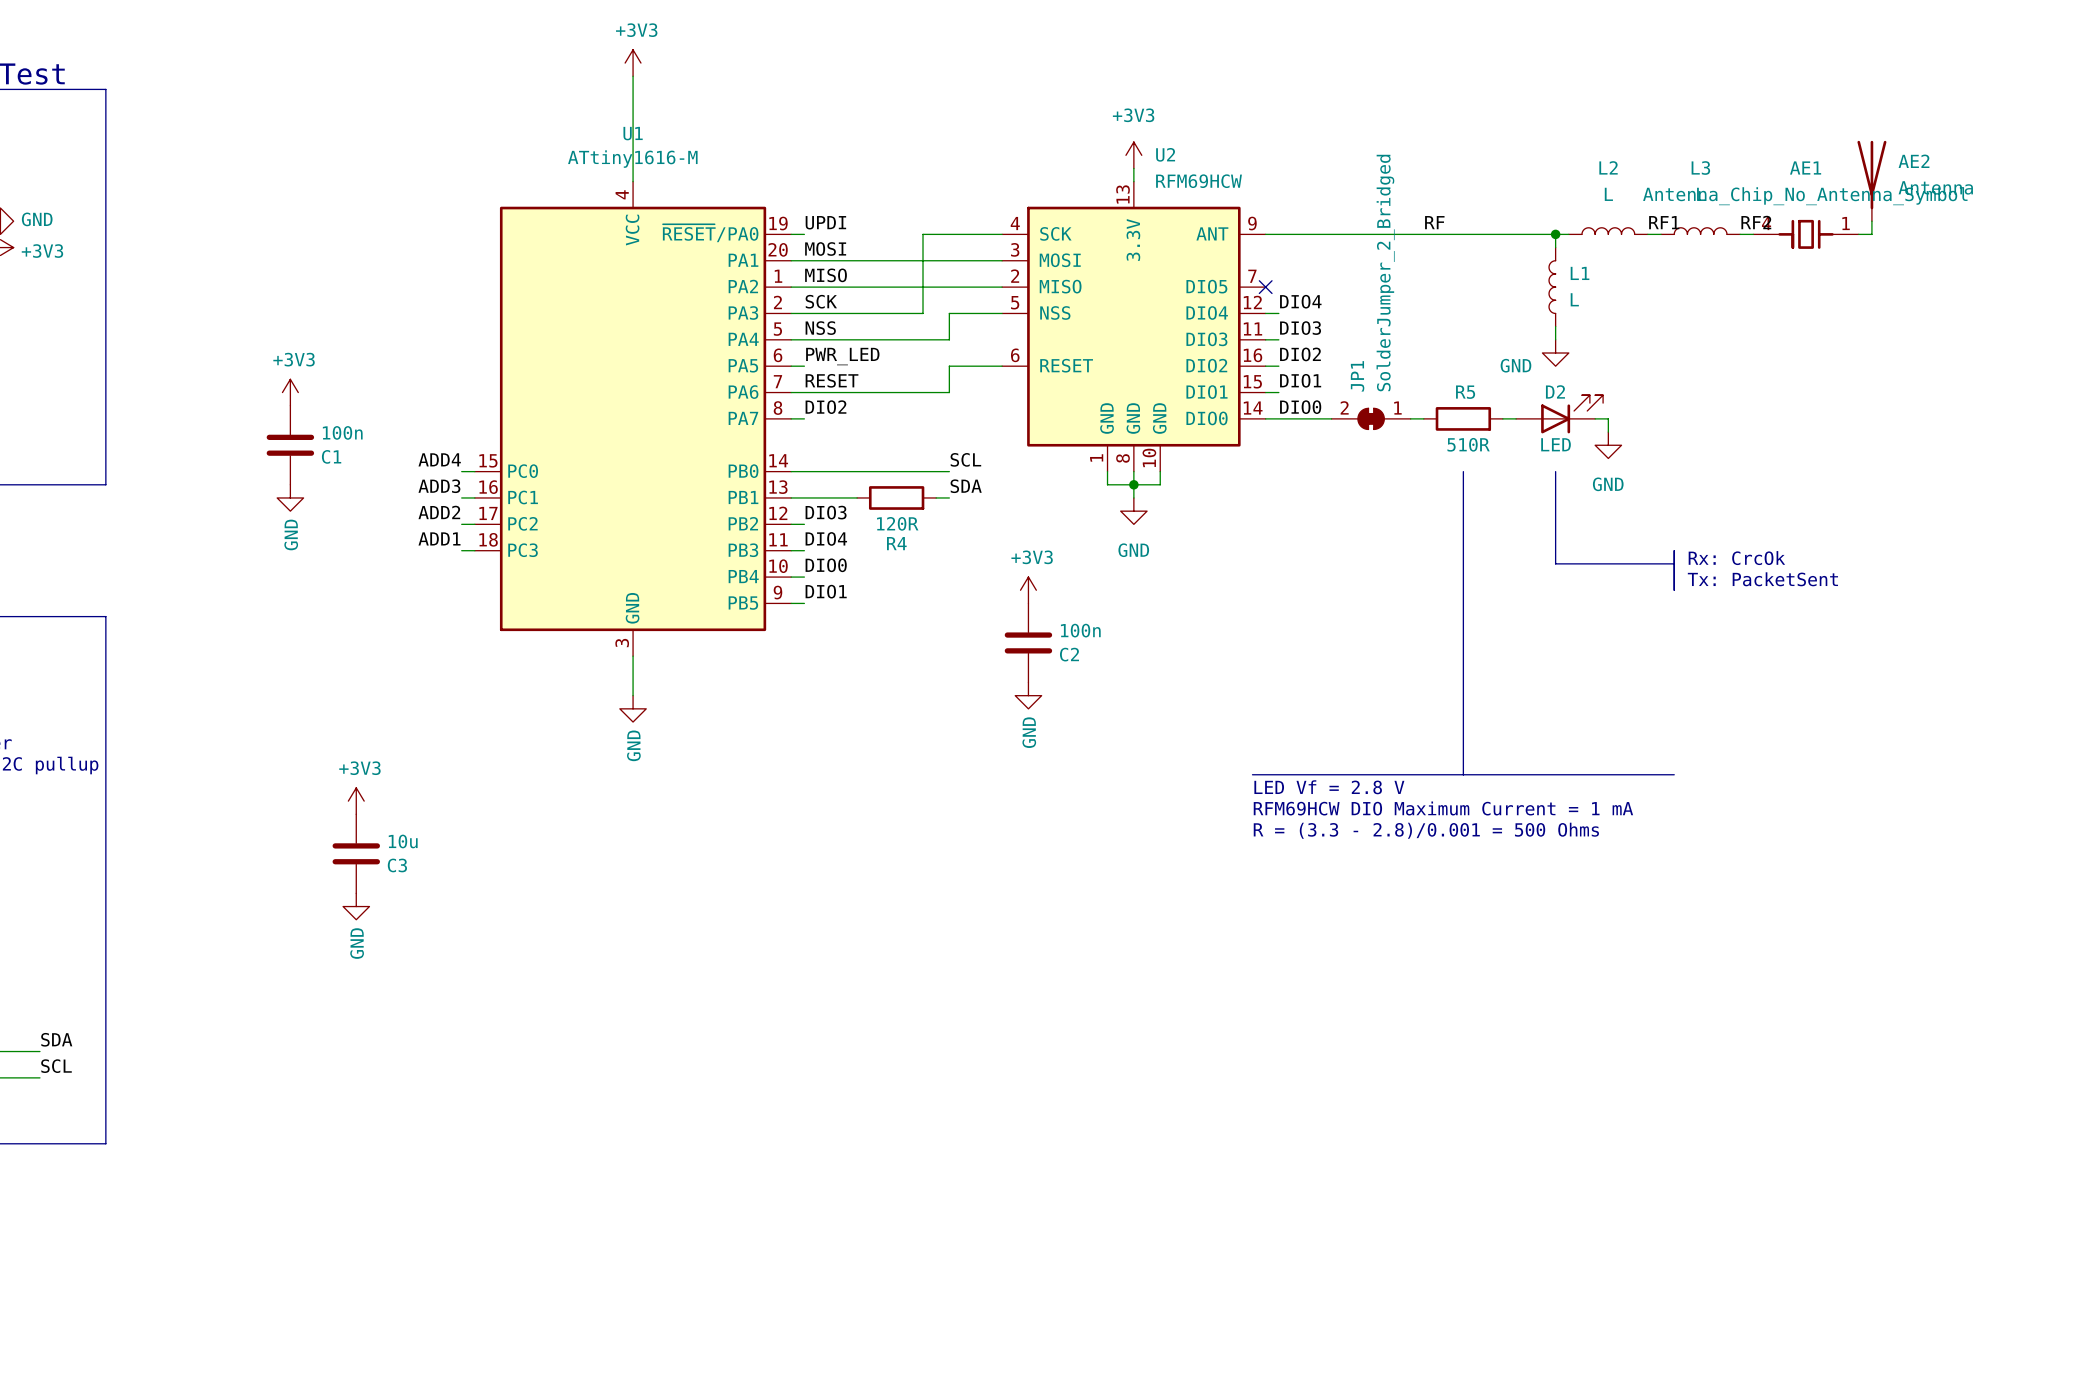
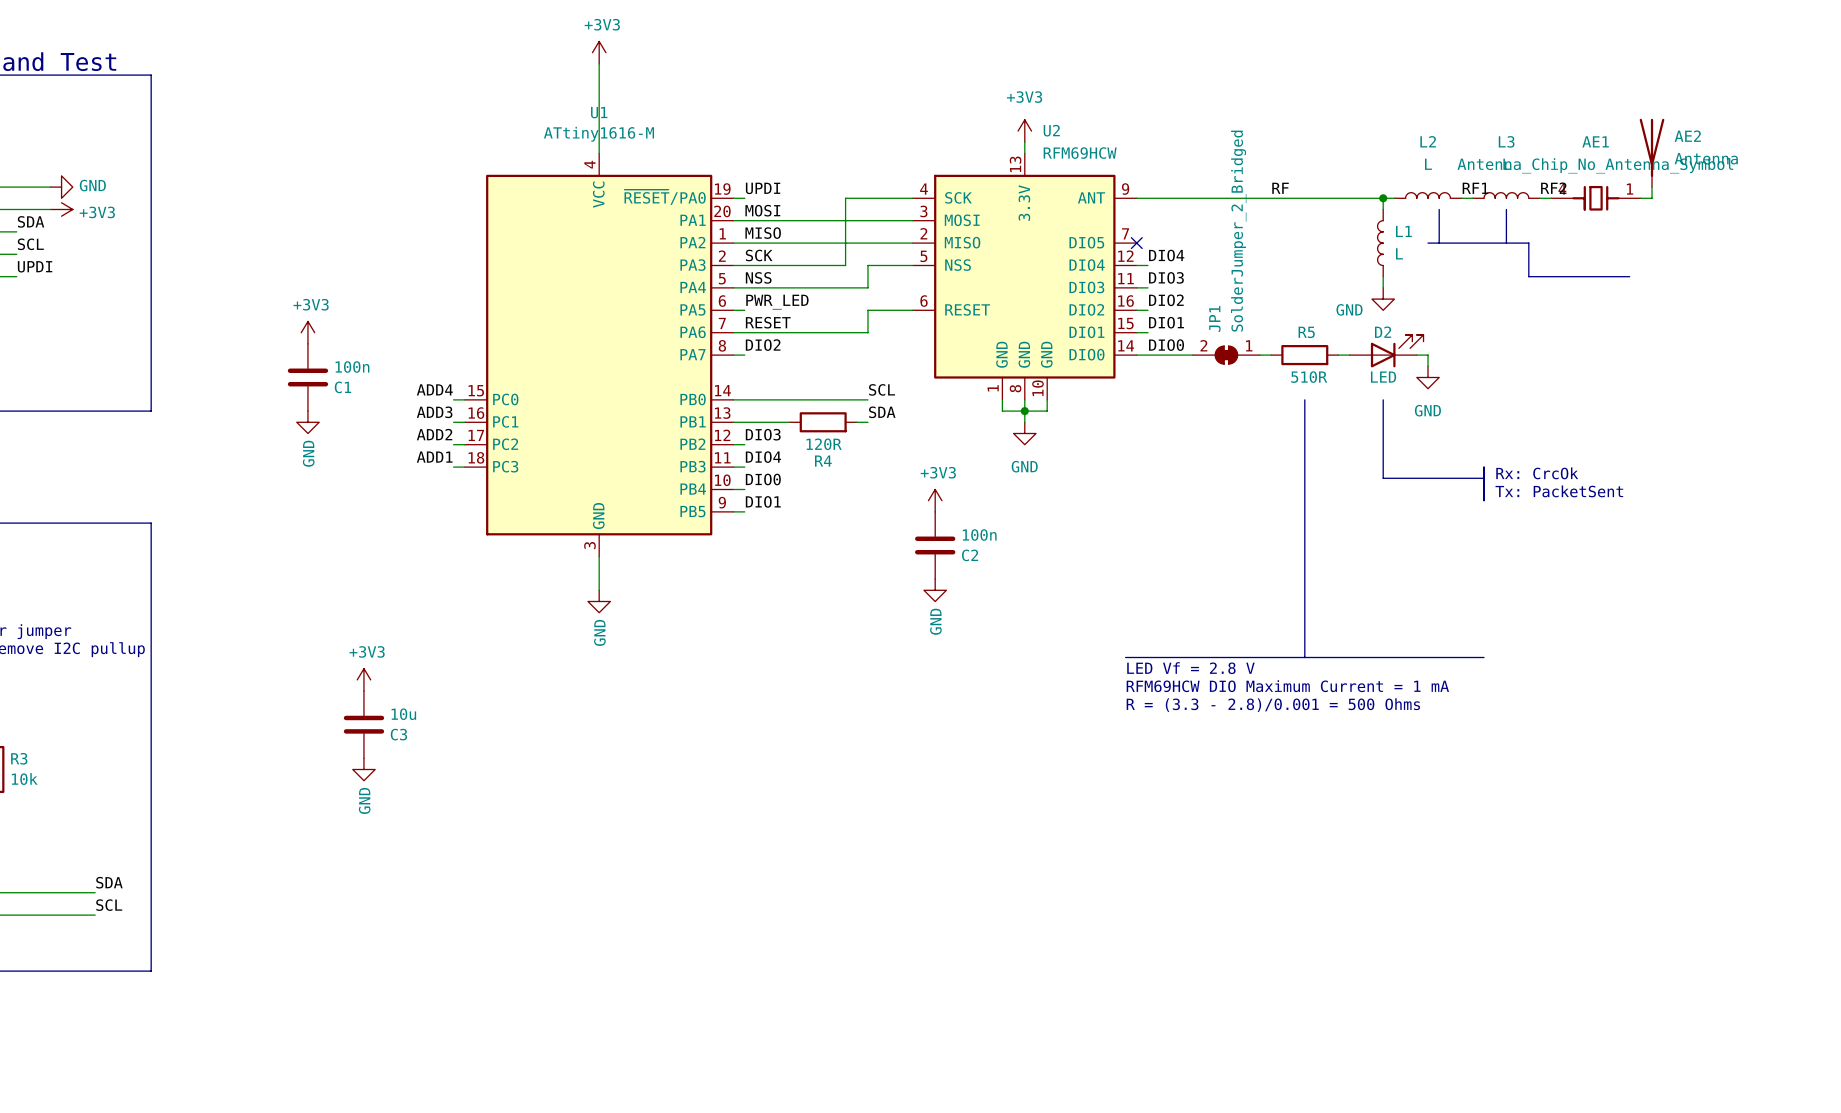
line: none -> (1439, 209) (1439, 243)
line: none -> (1506, 209) (1506, 243)
line: none -> (1428, 243) (1528, 243) (1528, 276) (1629, 276)

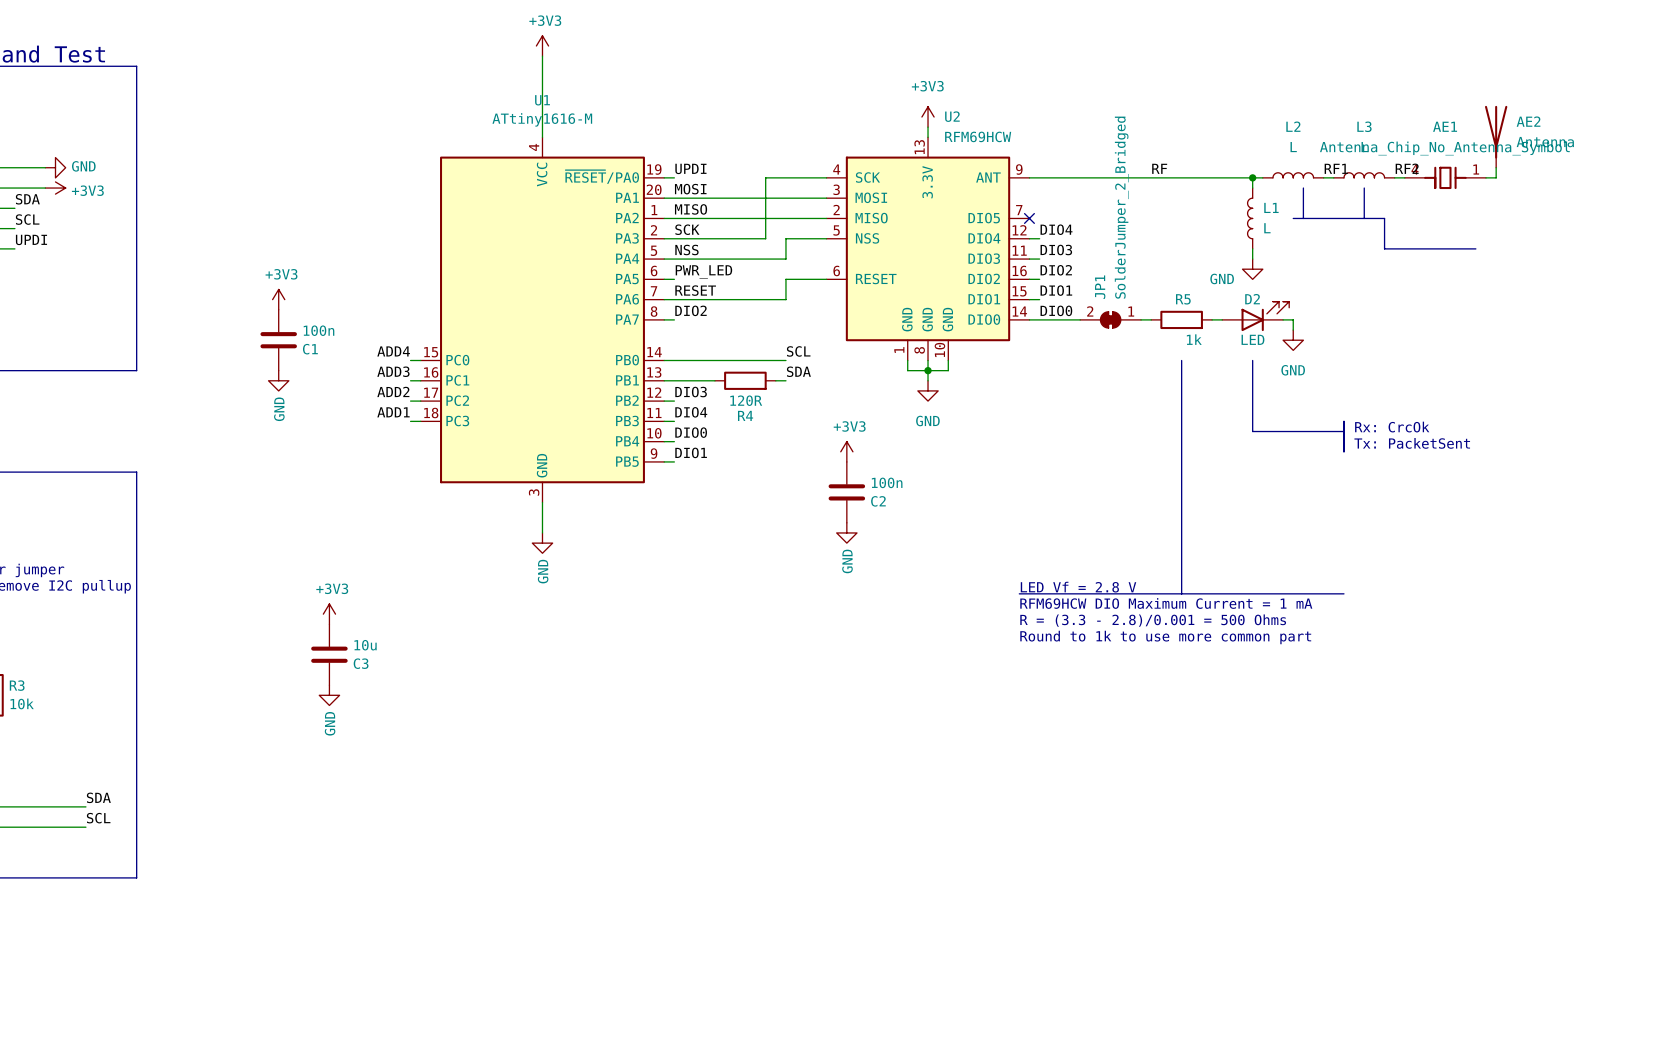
R5 value: 510R (1309, 377) -> 1k (1194, 339)
text: none -> LED Vf = 2.8 V (1078, 587)
text: LED Vf = 2.8 V (1190, 668) -> RFM69HCW DIO Maximum Current = 1 mA (1166, 603)
text: RFM69HCW DIO Maximum Current = 1 mA (1287, 686) -> R = (3.3 - 2.8)/0.001 = 500 Ohms (1153, 620)
text: R = (3.3 - 2.8)/0.001 = 500 Ohms (1273, 705) -> Round to 1k to use more common part (1165, 637)

